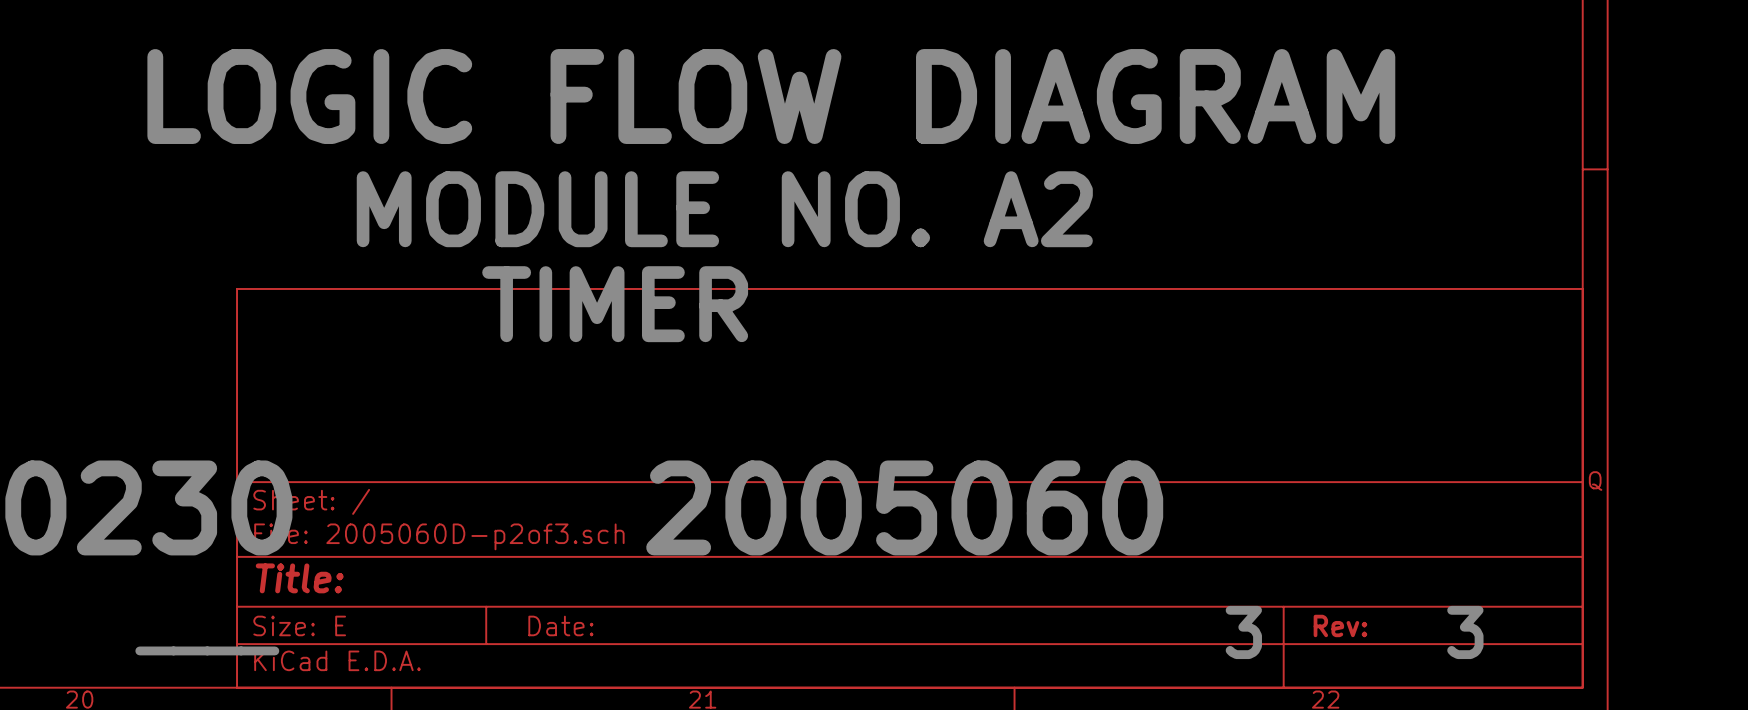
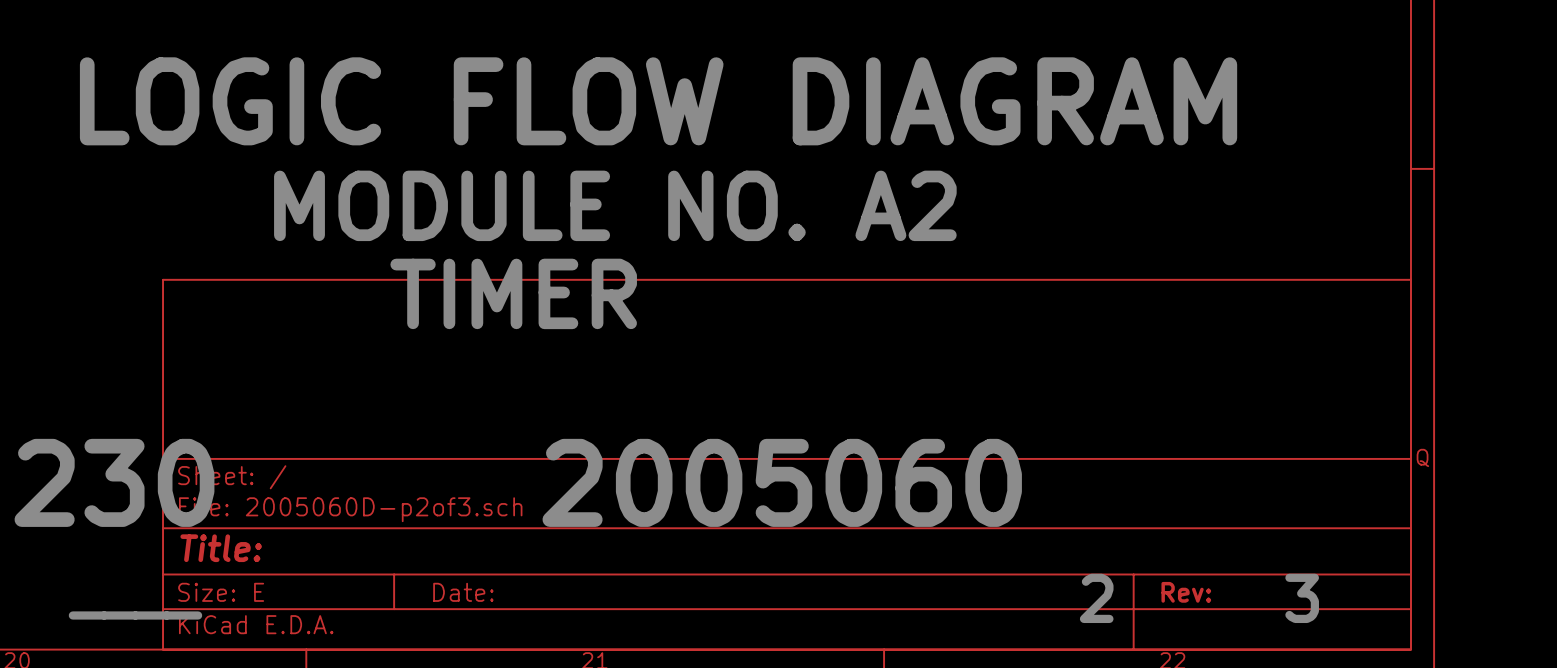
text: 3 (1243, 632) -> 2 (1096, 598)

